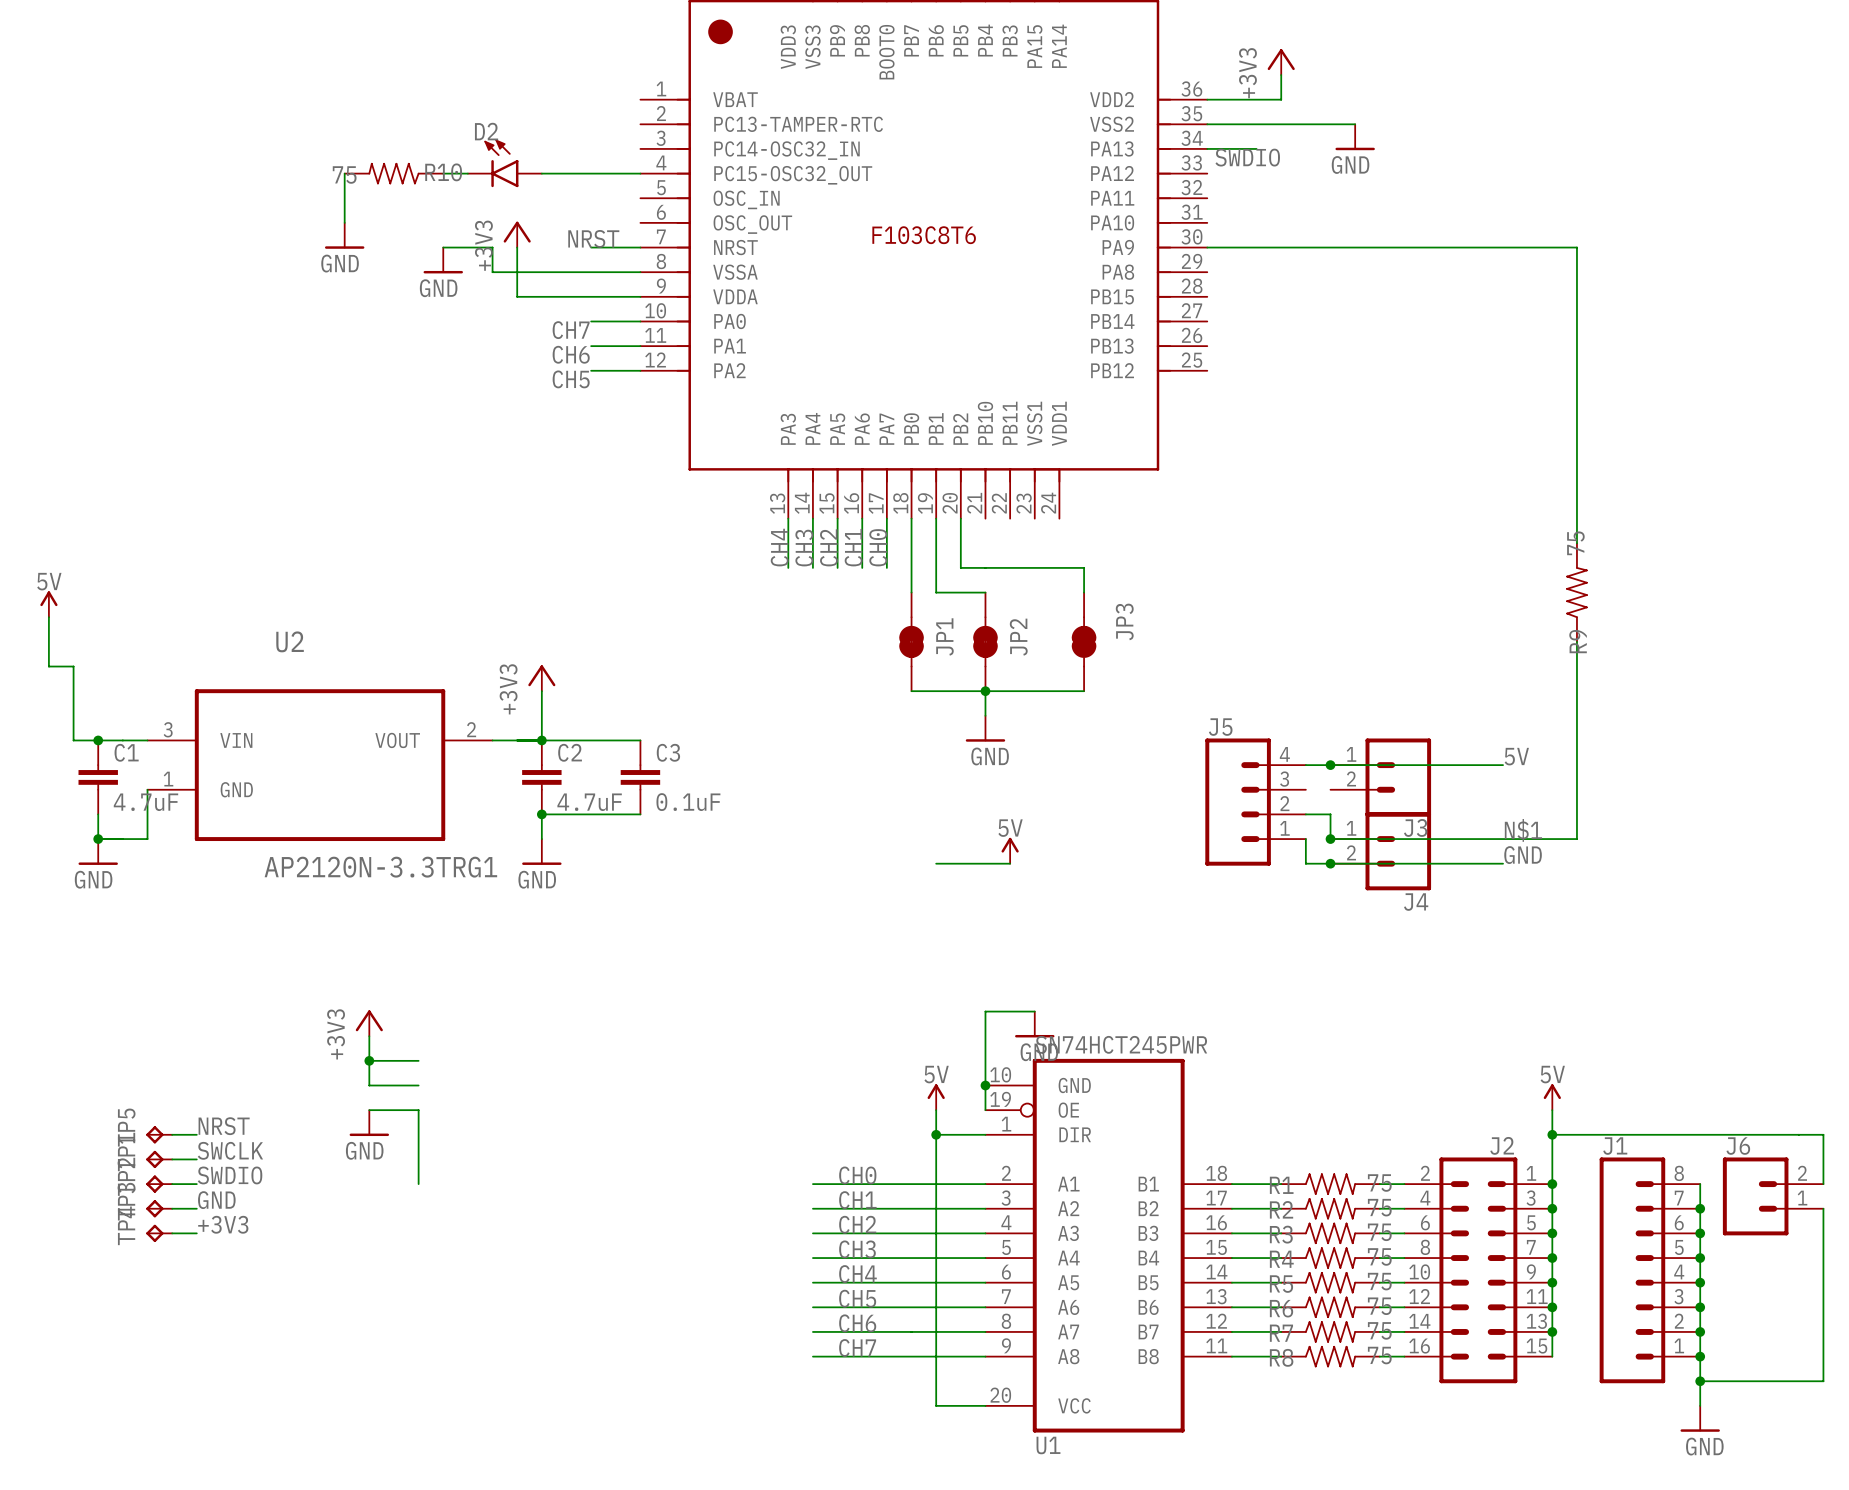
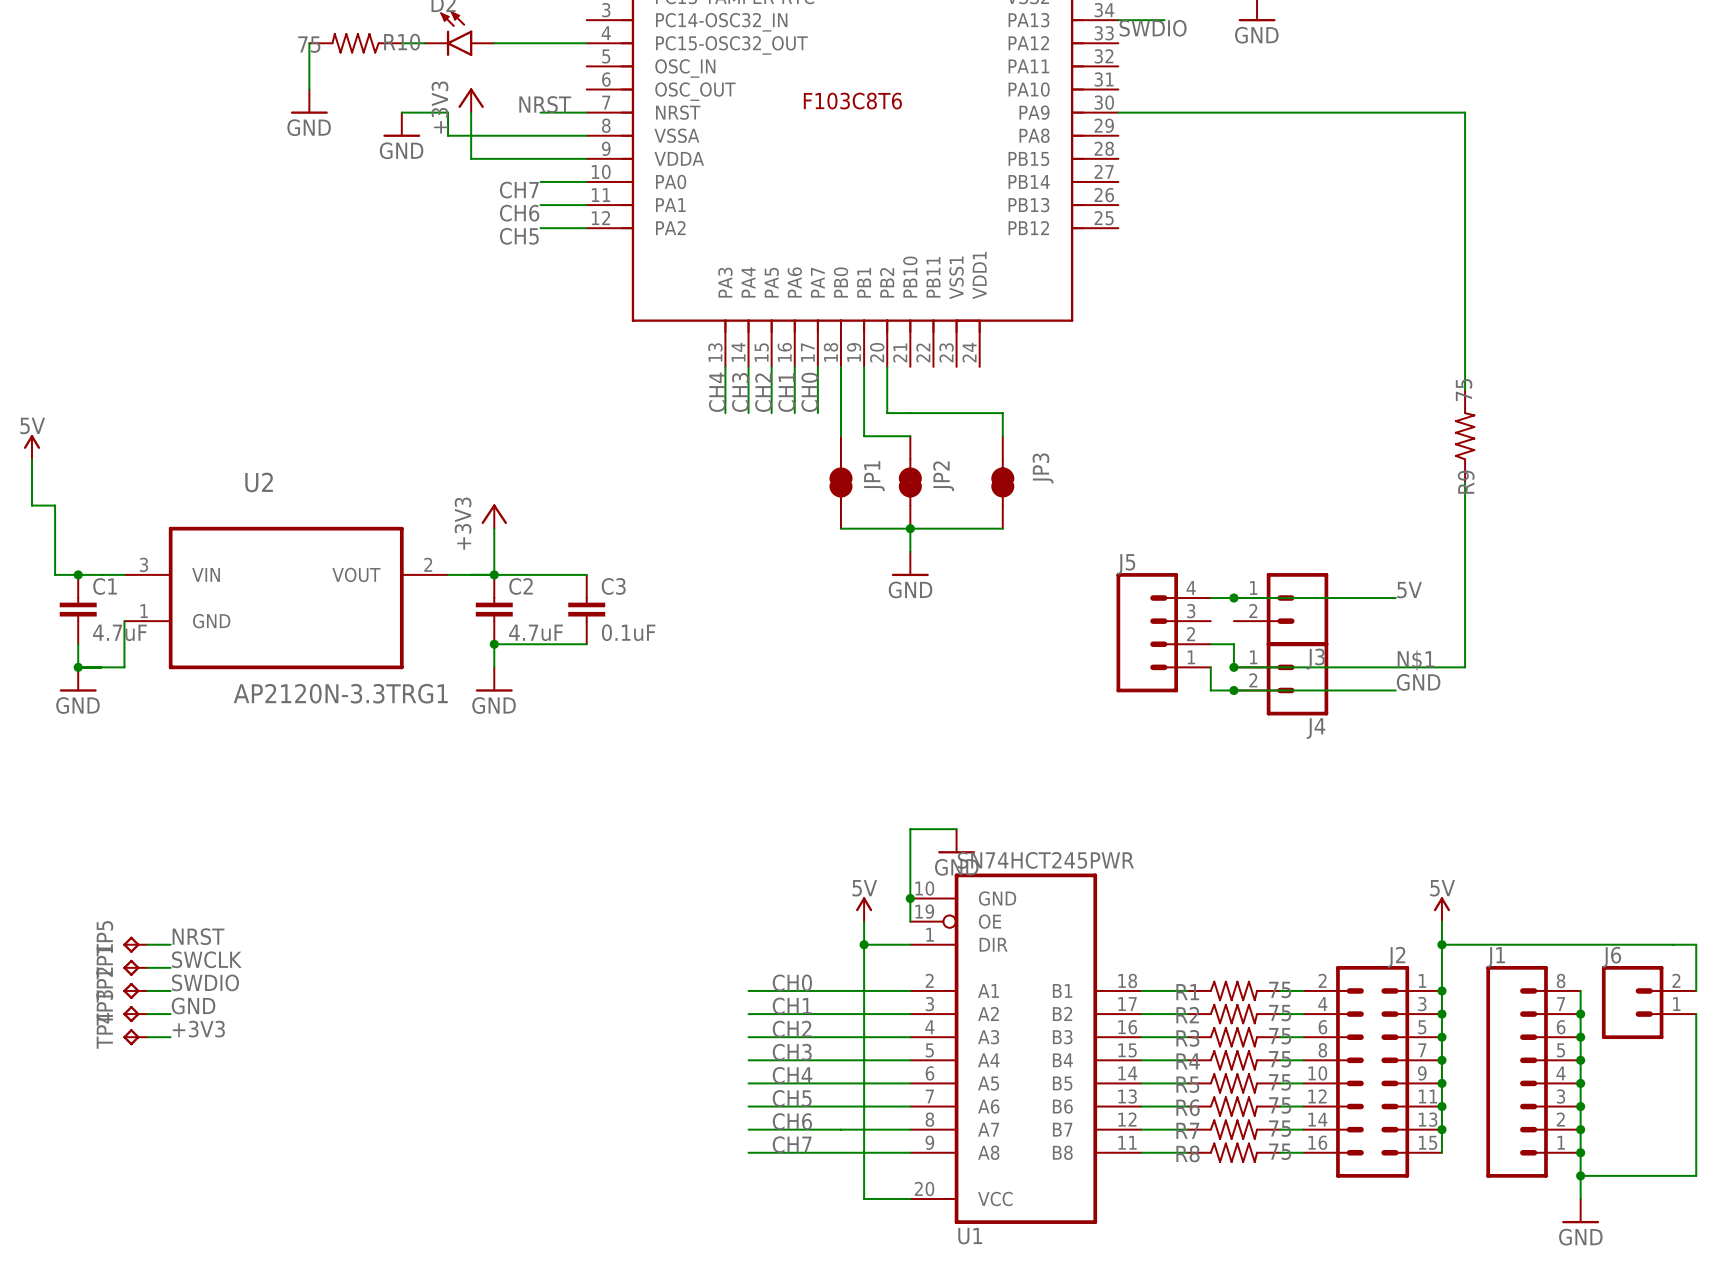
power symbol: 5V (1010, 850) -> none
wire: (936, 863) (1010, 863) -> none
power symbol: +3V3 (369, 1023) -> none
wire: (369, 1036) (369, 1085) (418, 1085) -> none
wire: (369, 1060) (418, 1060) -> none
junction: (369, 1060) -> none
wire: (369, 1110) (418, 1110) (418, 1184) -> none
power symbol: GND (369, 1123) -> none

